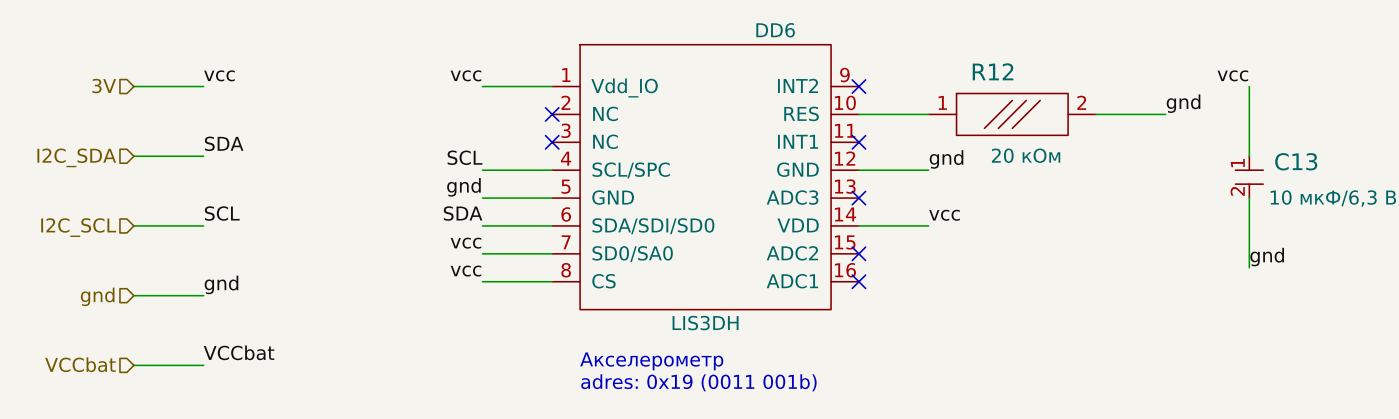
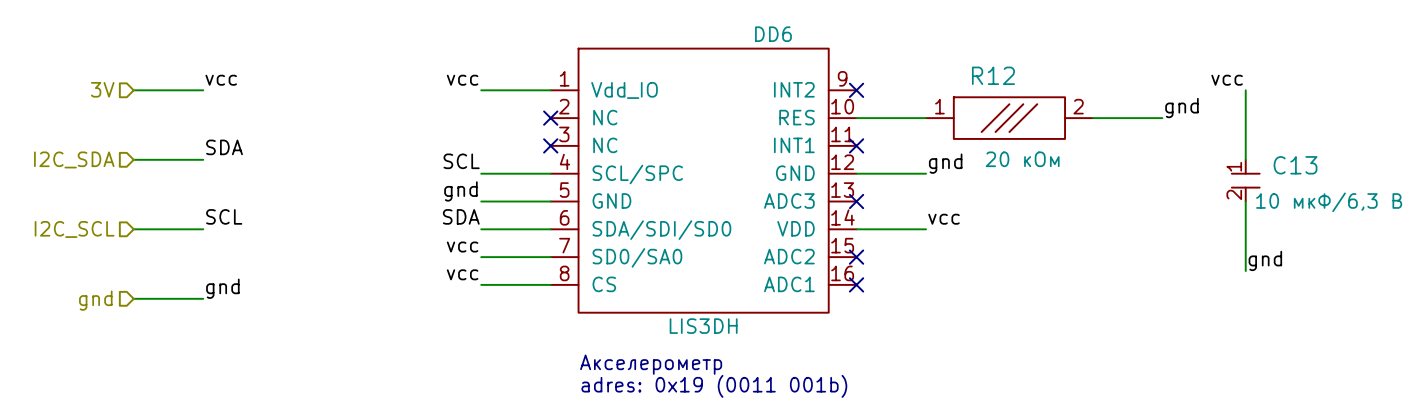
label: VCCbat (239, 352) -> none
hierarchical label: VCCbat (80, 364) -> none
wire: (133, 365) (203, 365) -> none

